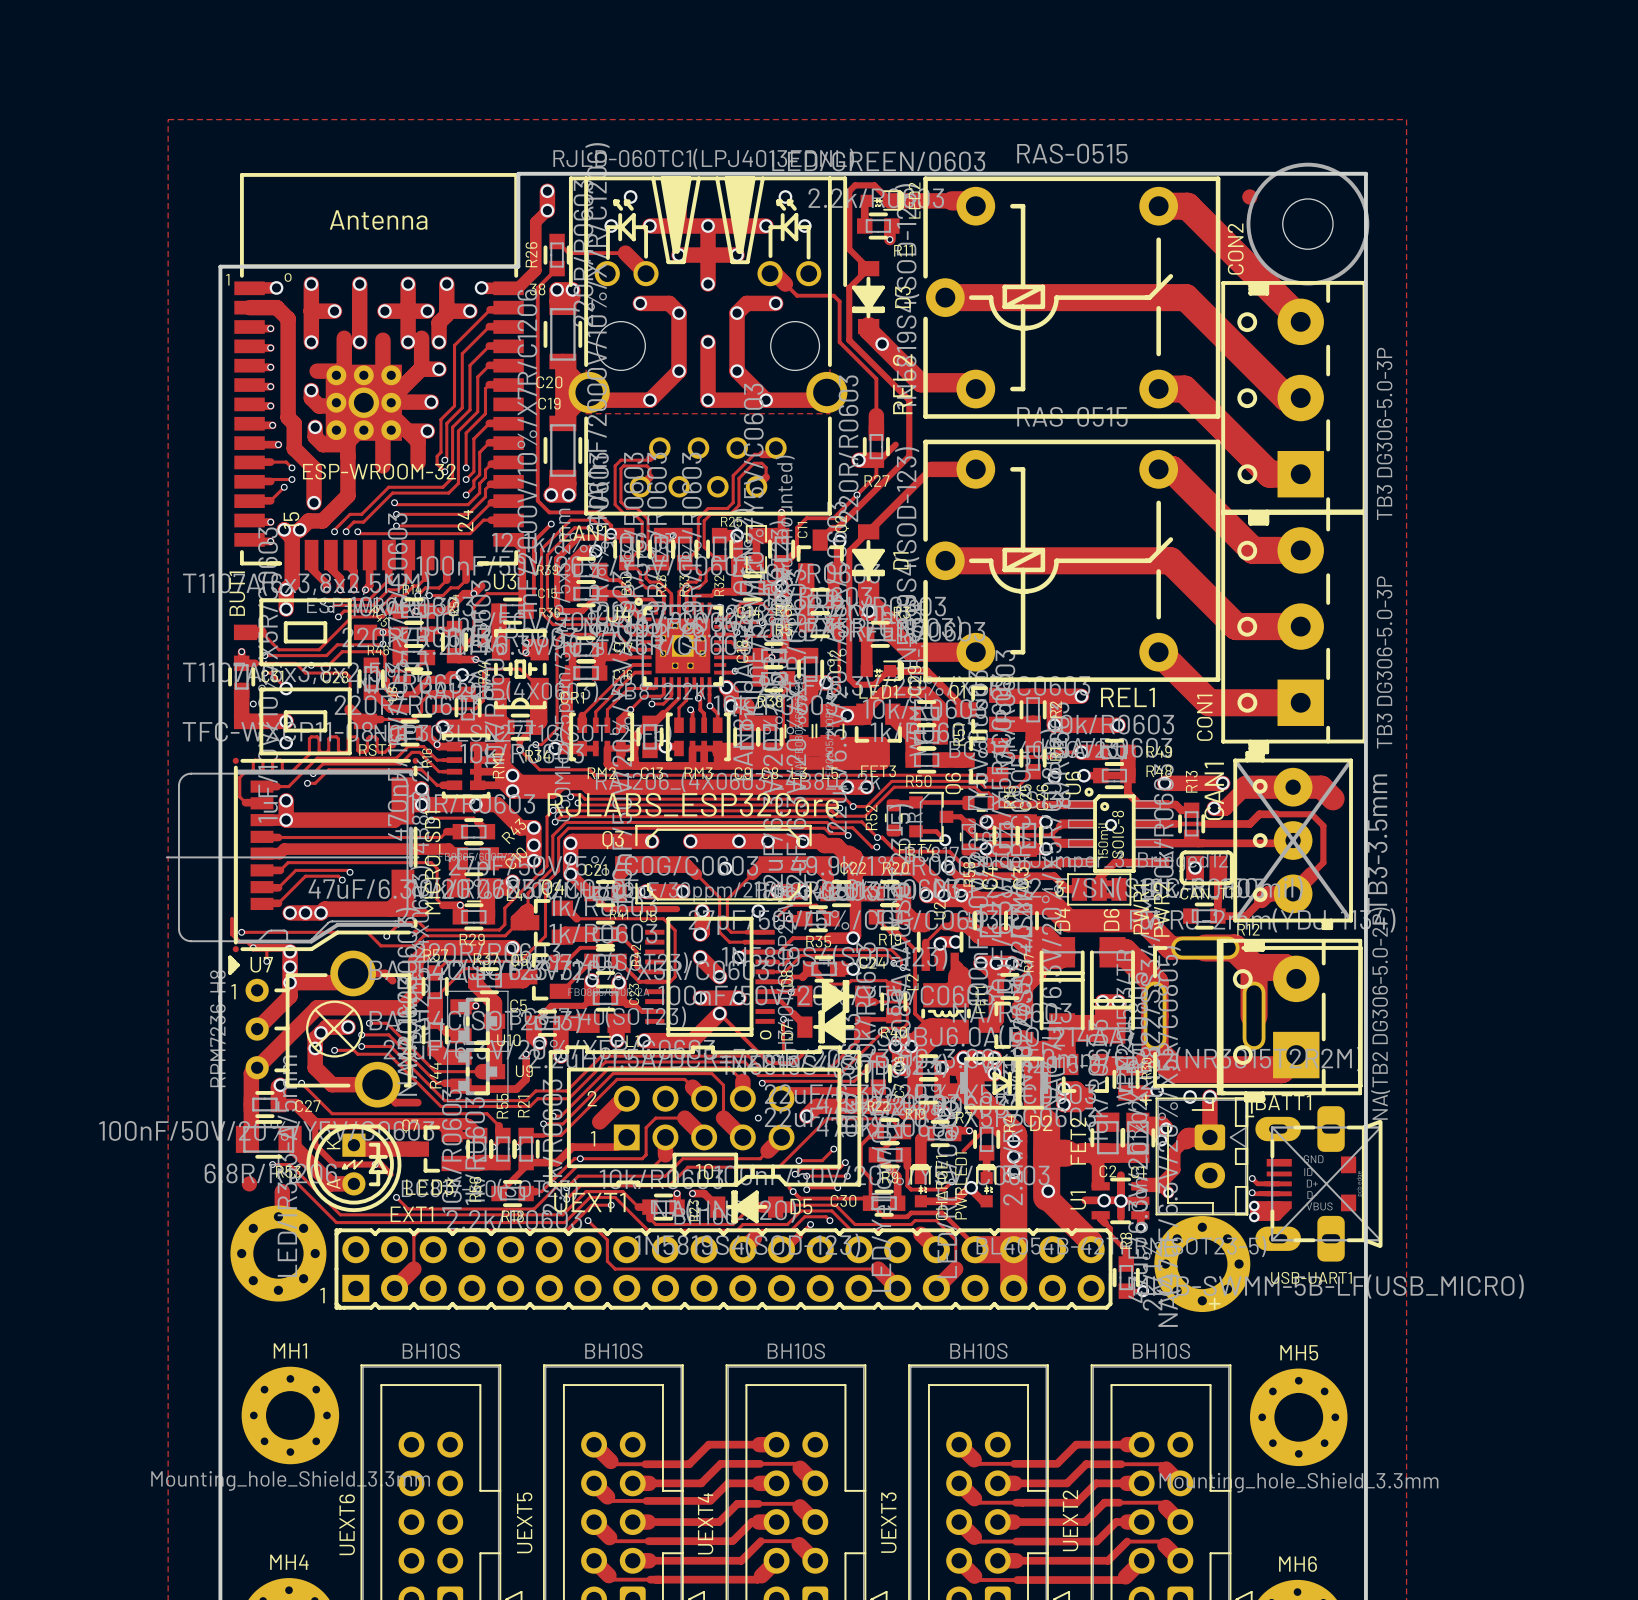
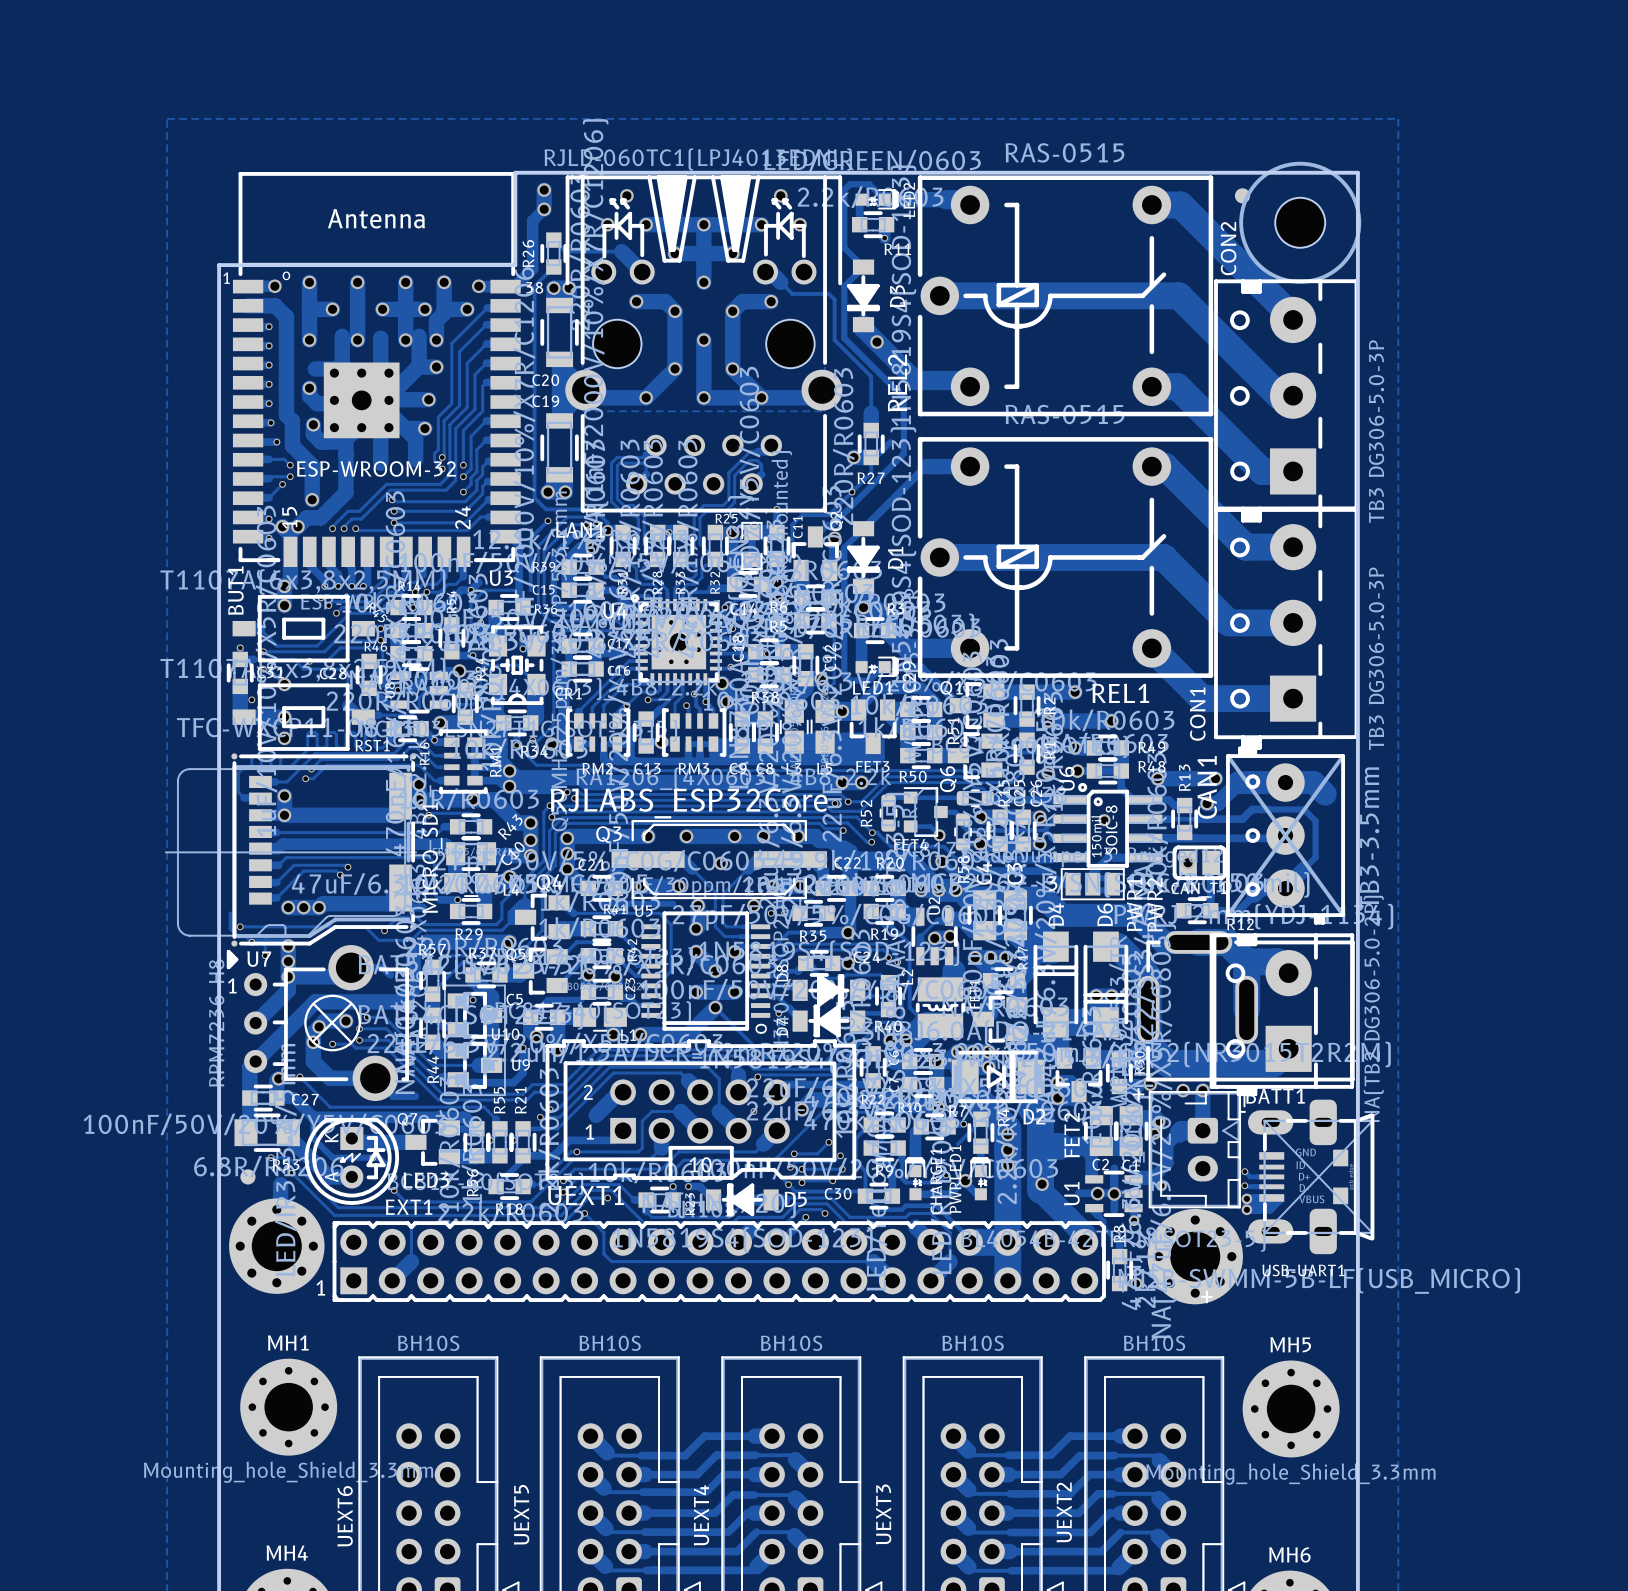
via: (899, 1068) -> none

